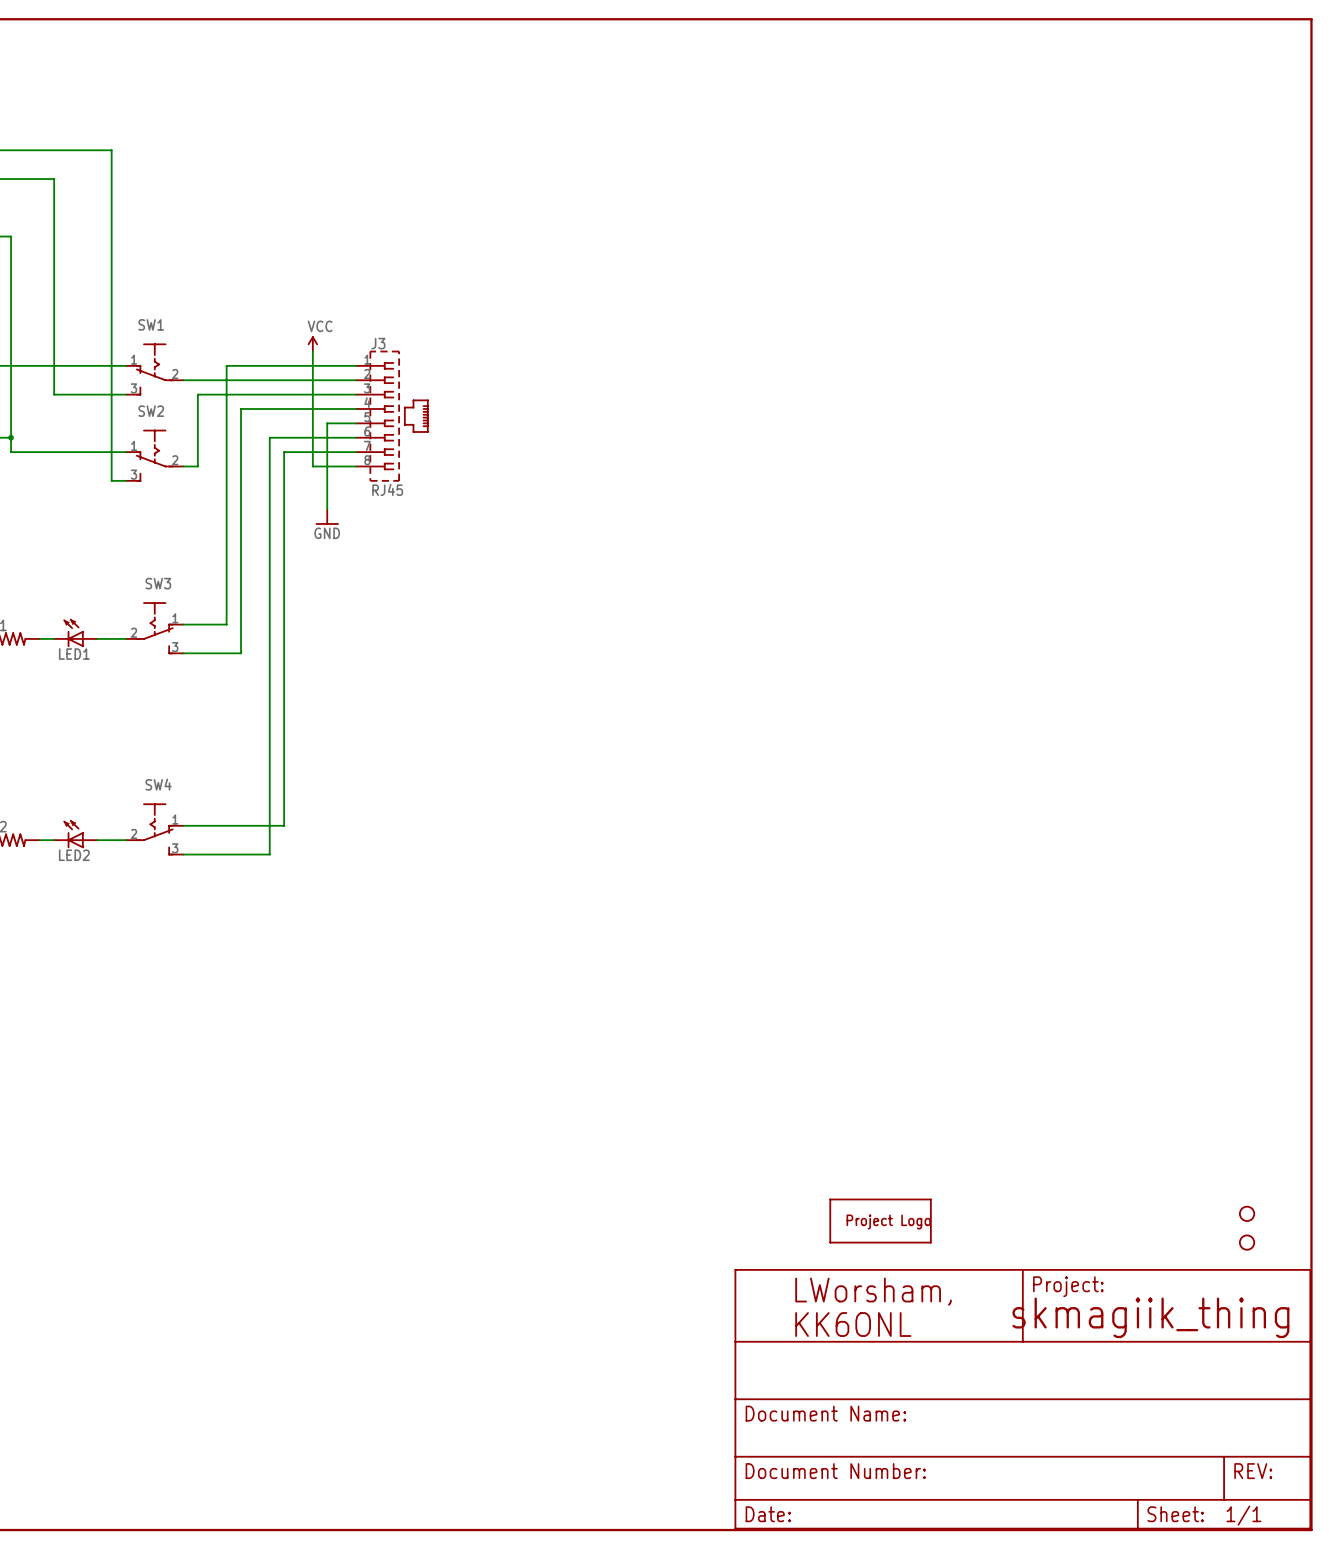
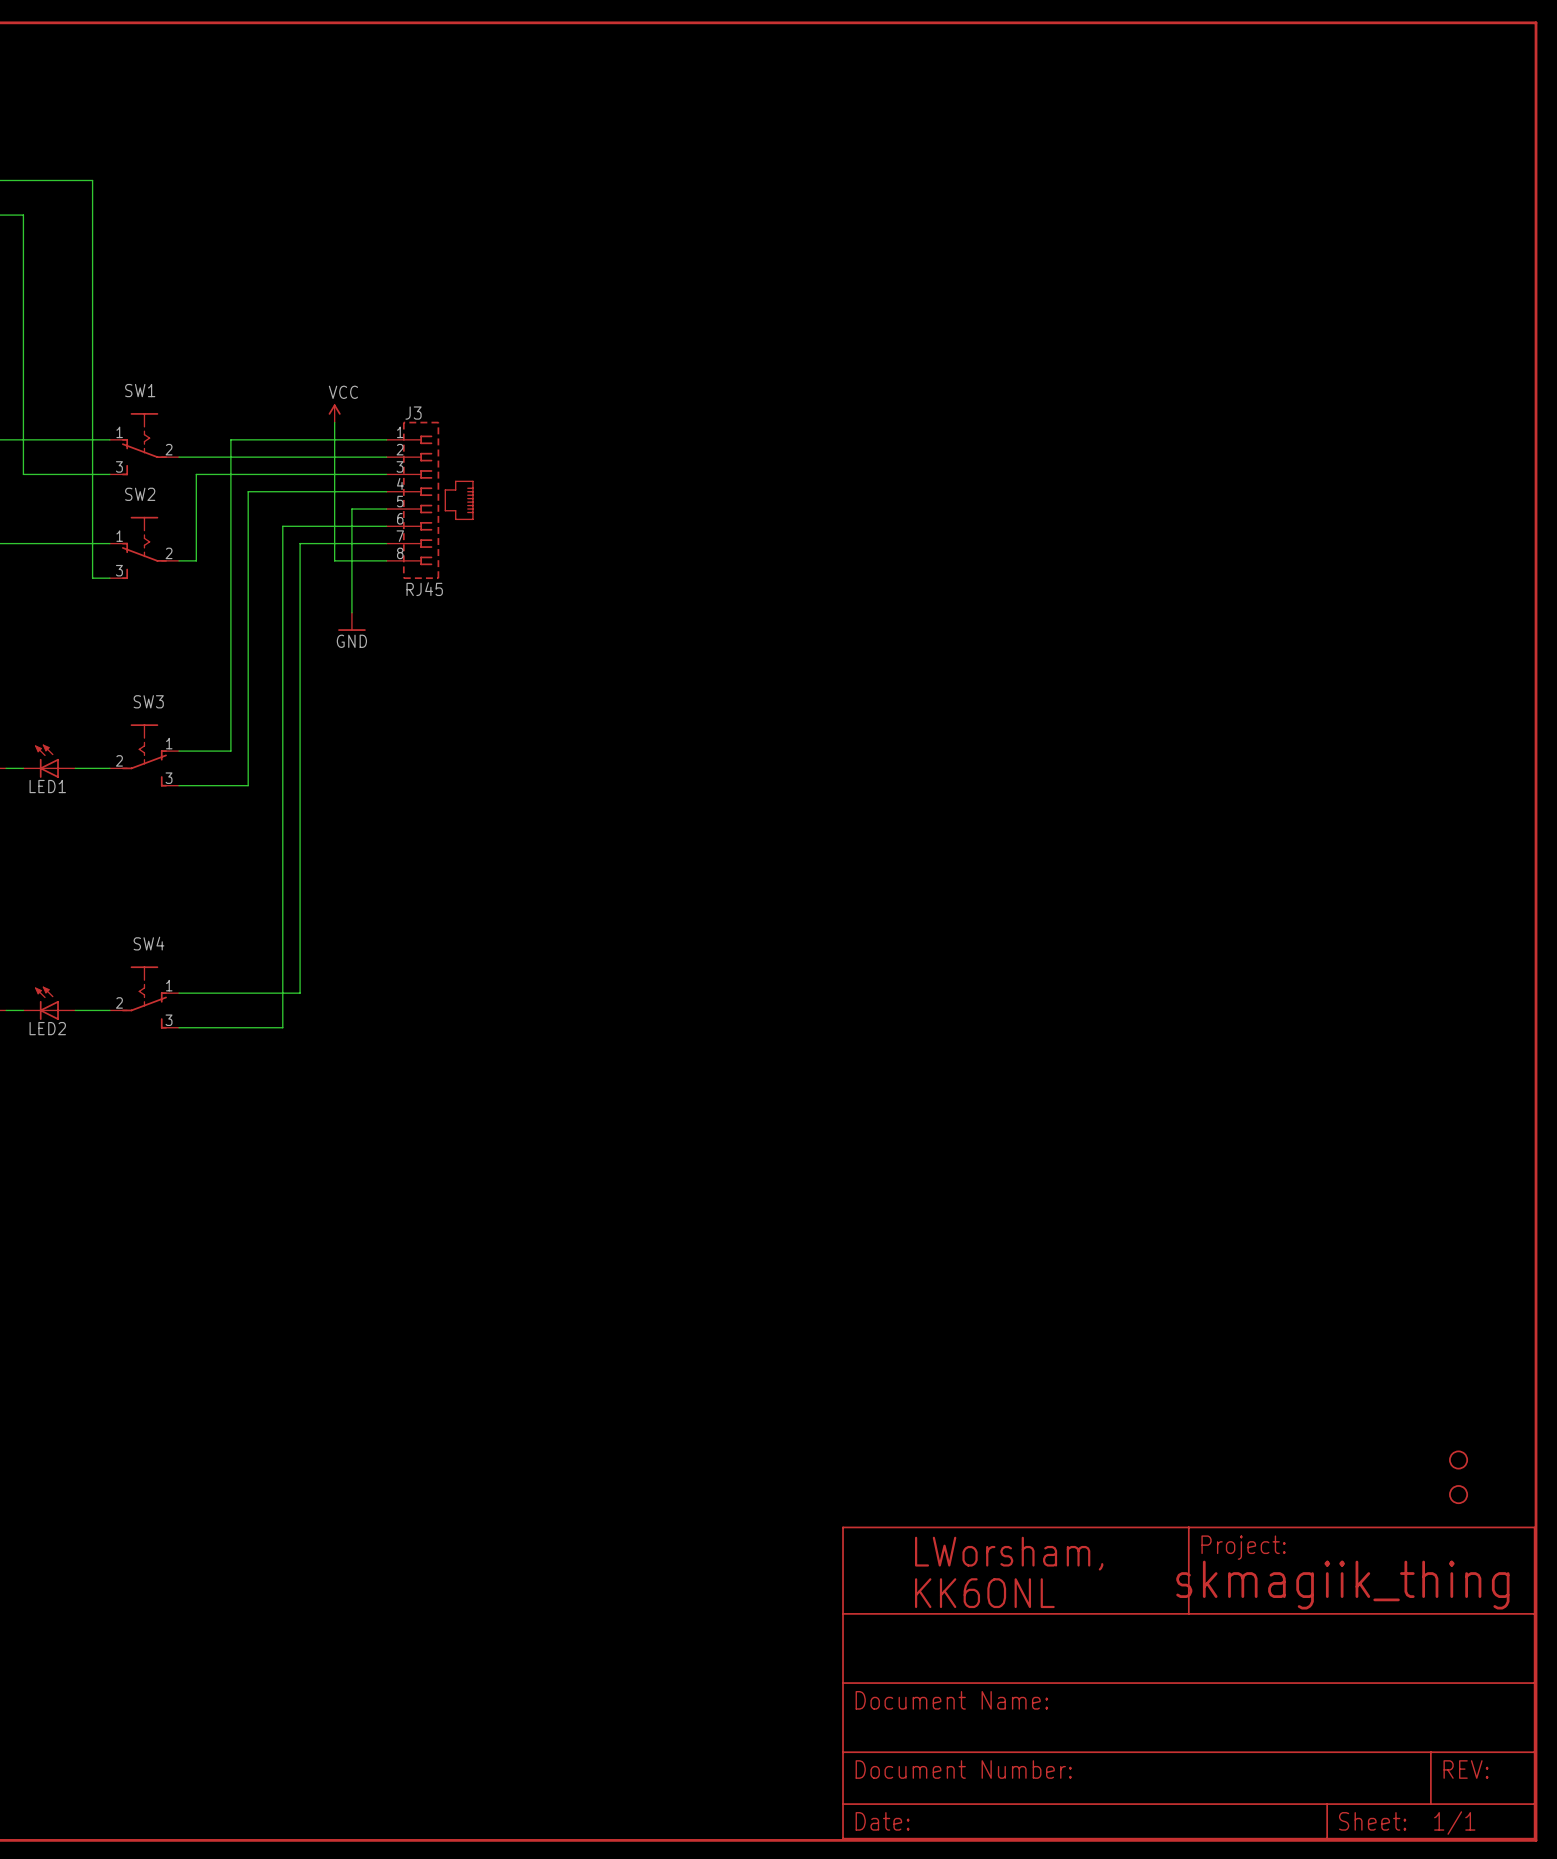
part: (880, 1221) -> none

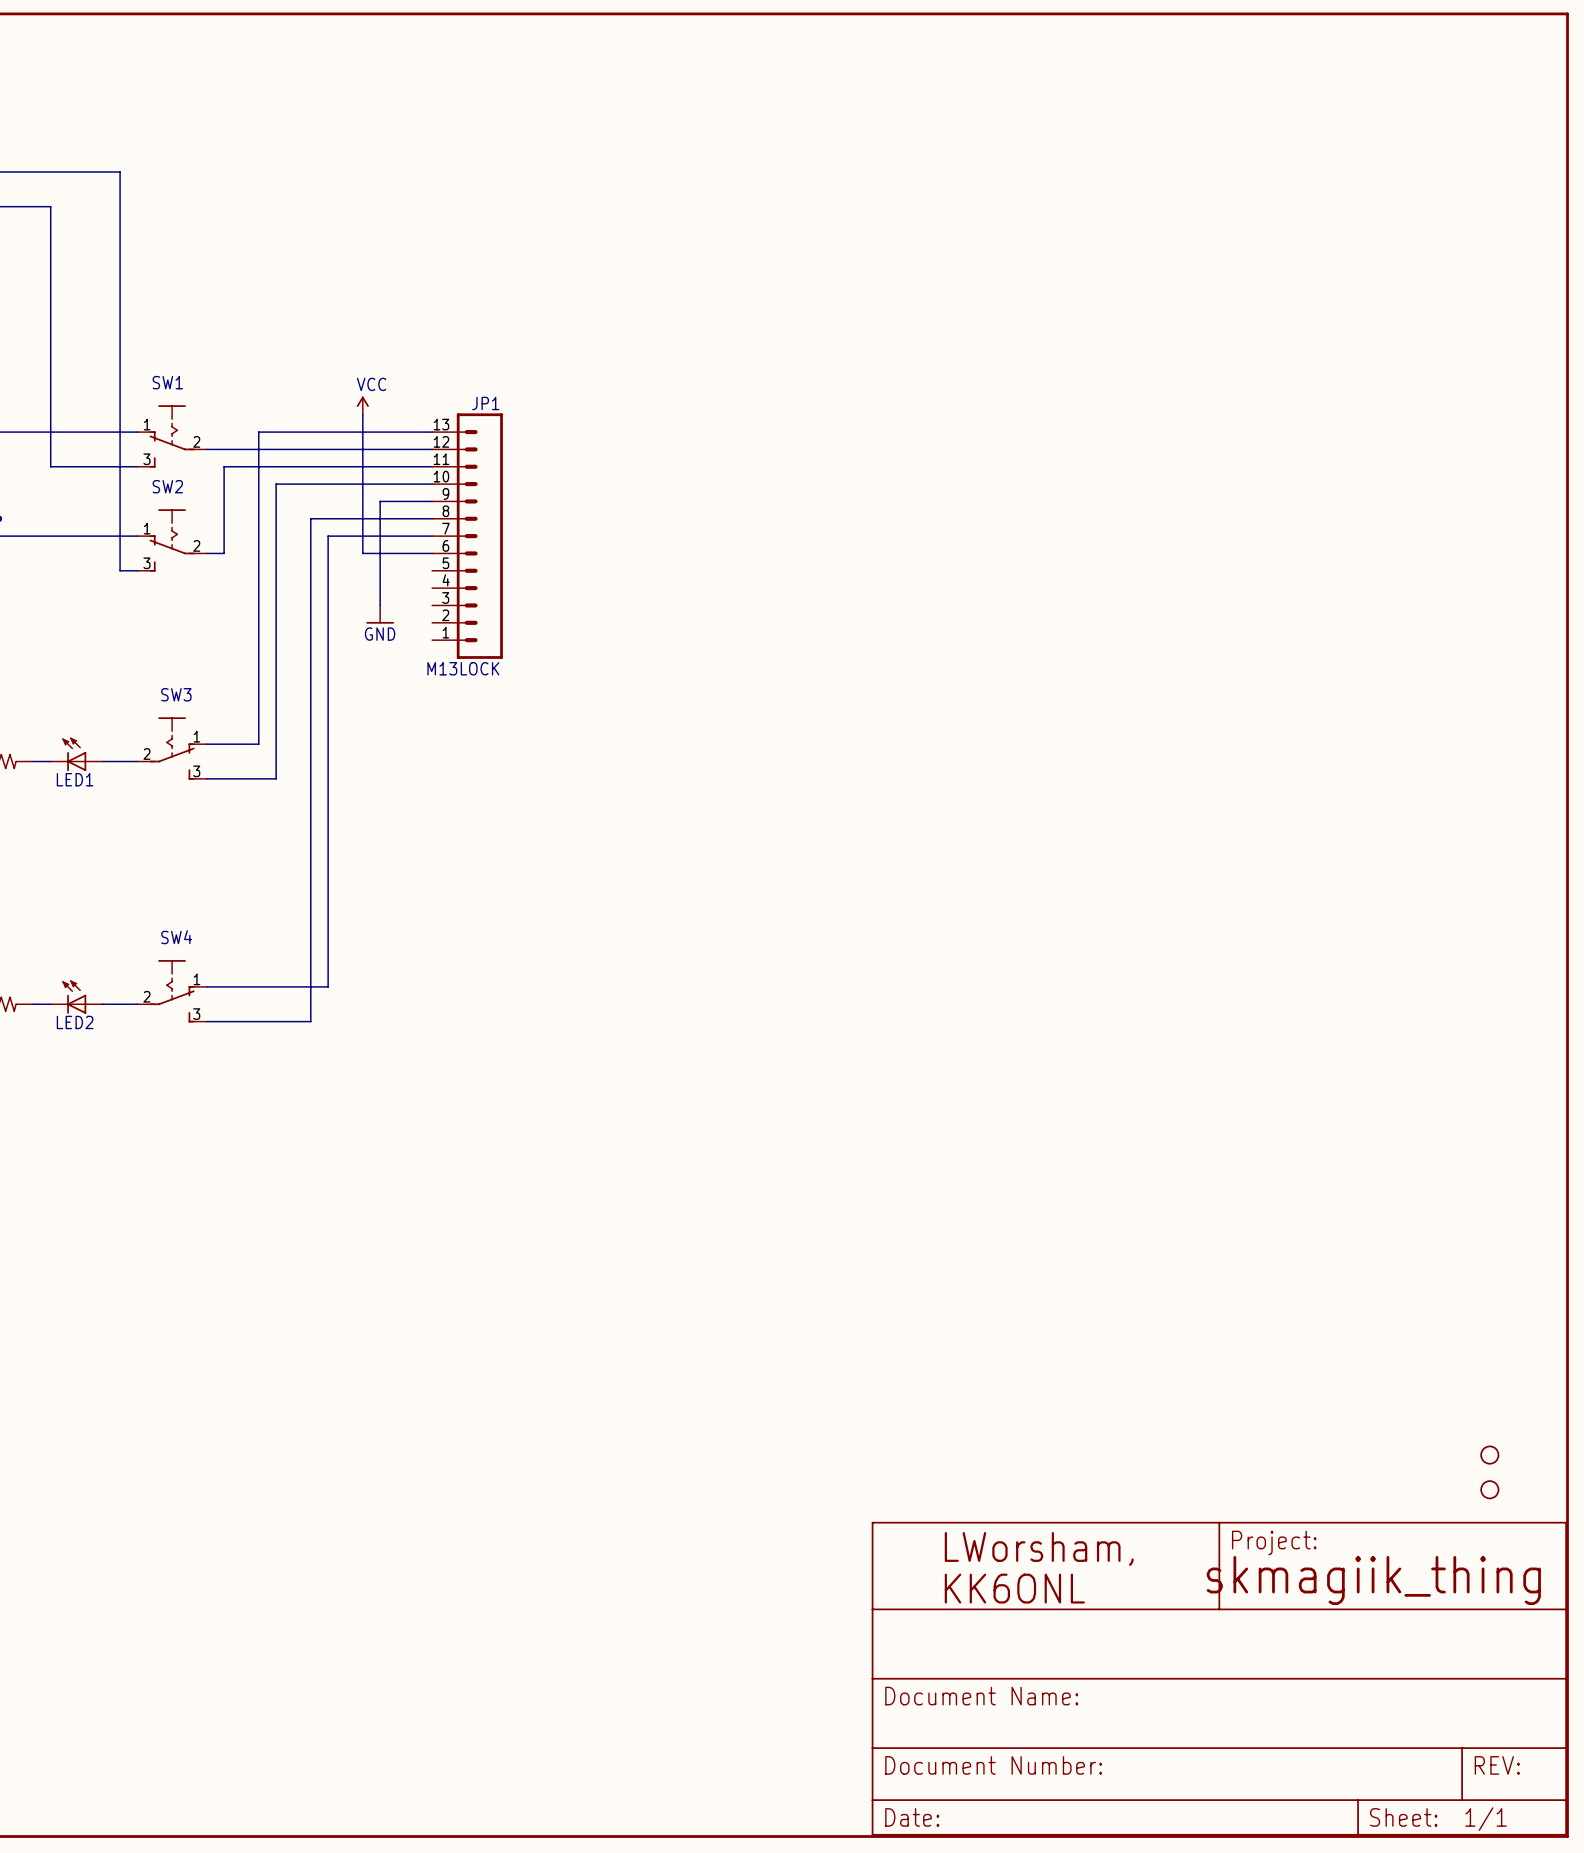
J3: RJ45 (430, 500) -> none
JP1: none -> M13LOCK (467, 536)

